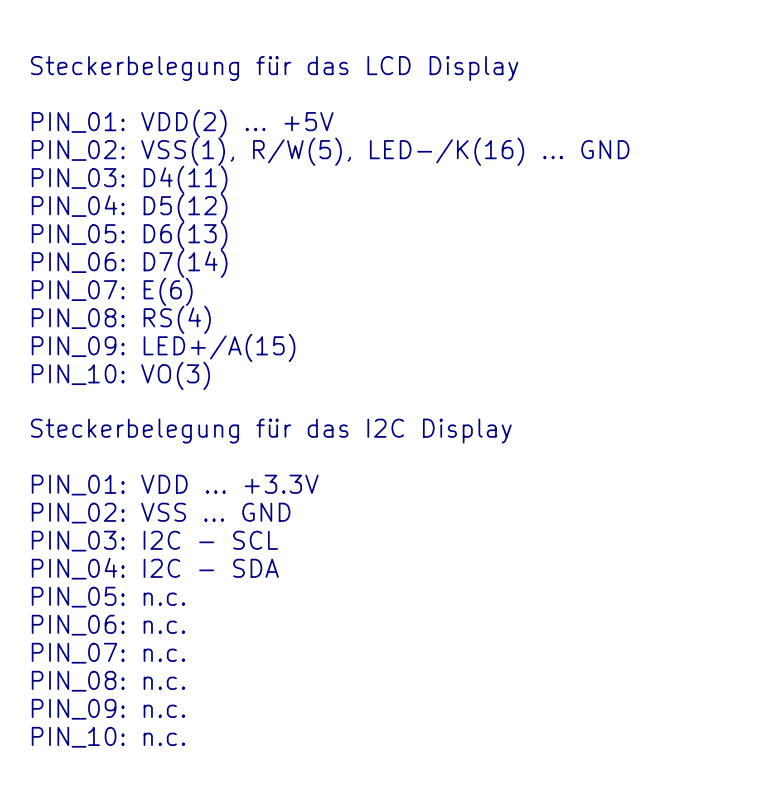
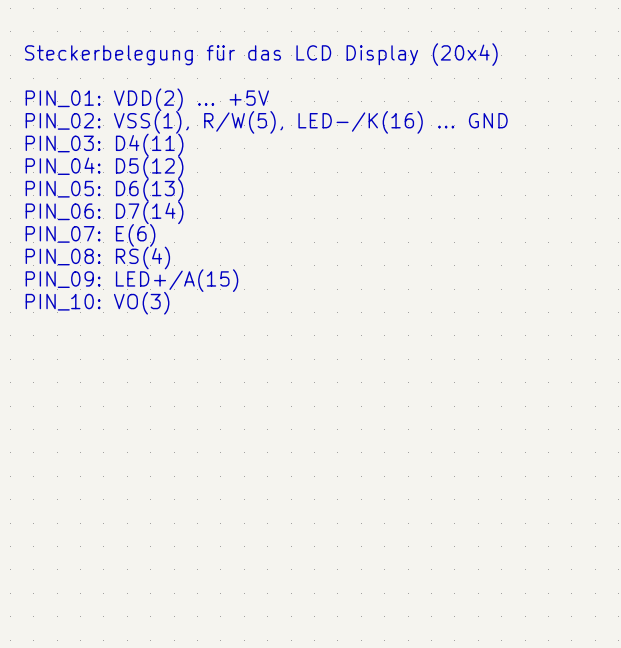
text: Steckerbelegung für das LCD Display (274, 68) -> Steckerbelegung für das LCD Display (20x4) (261, 54)
text: Steckerbelegung für das I2C Display (271, 431) -> none
text: PIN_01: VDD ... +3.3V (175, 485) -> none
text: PIN_02: VSS ... GND (161, 513) -> none
text: PIN_03: I2C - SCL (154, 541) -> none
text: PIN_04: I2C - SDA (155, 568) -> none
text: PIN_05: n.c. (108, 597) -> none
text: PIN_06: n.c. (108, 625) -> none
text: PIN_07: n.c. (108, 653) -> none
text: PIN_08: n.c. (108, 681) -> none
text: PIN_09: n.c. (108, 709) -> none
text: PIN_10: n.c. (108, 737) -> none

